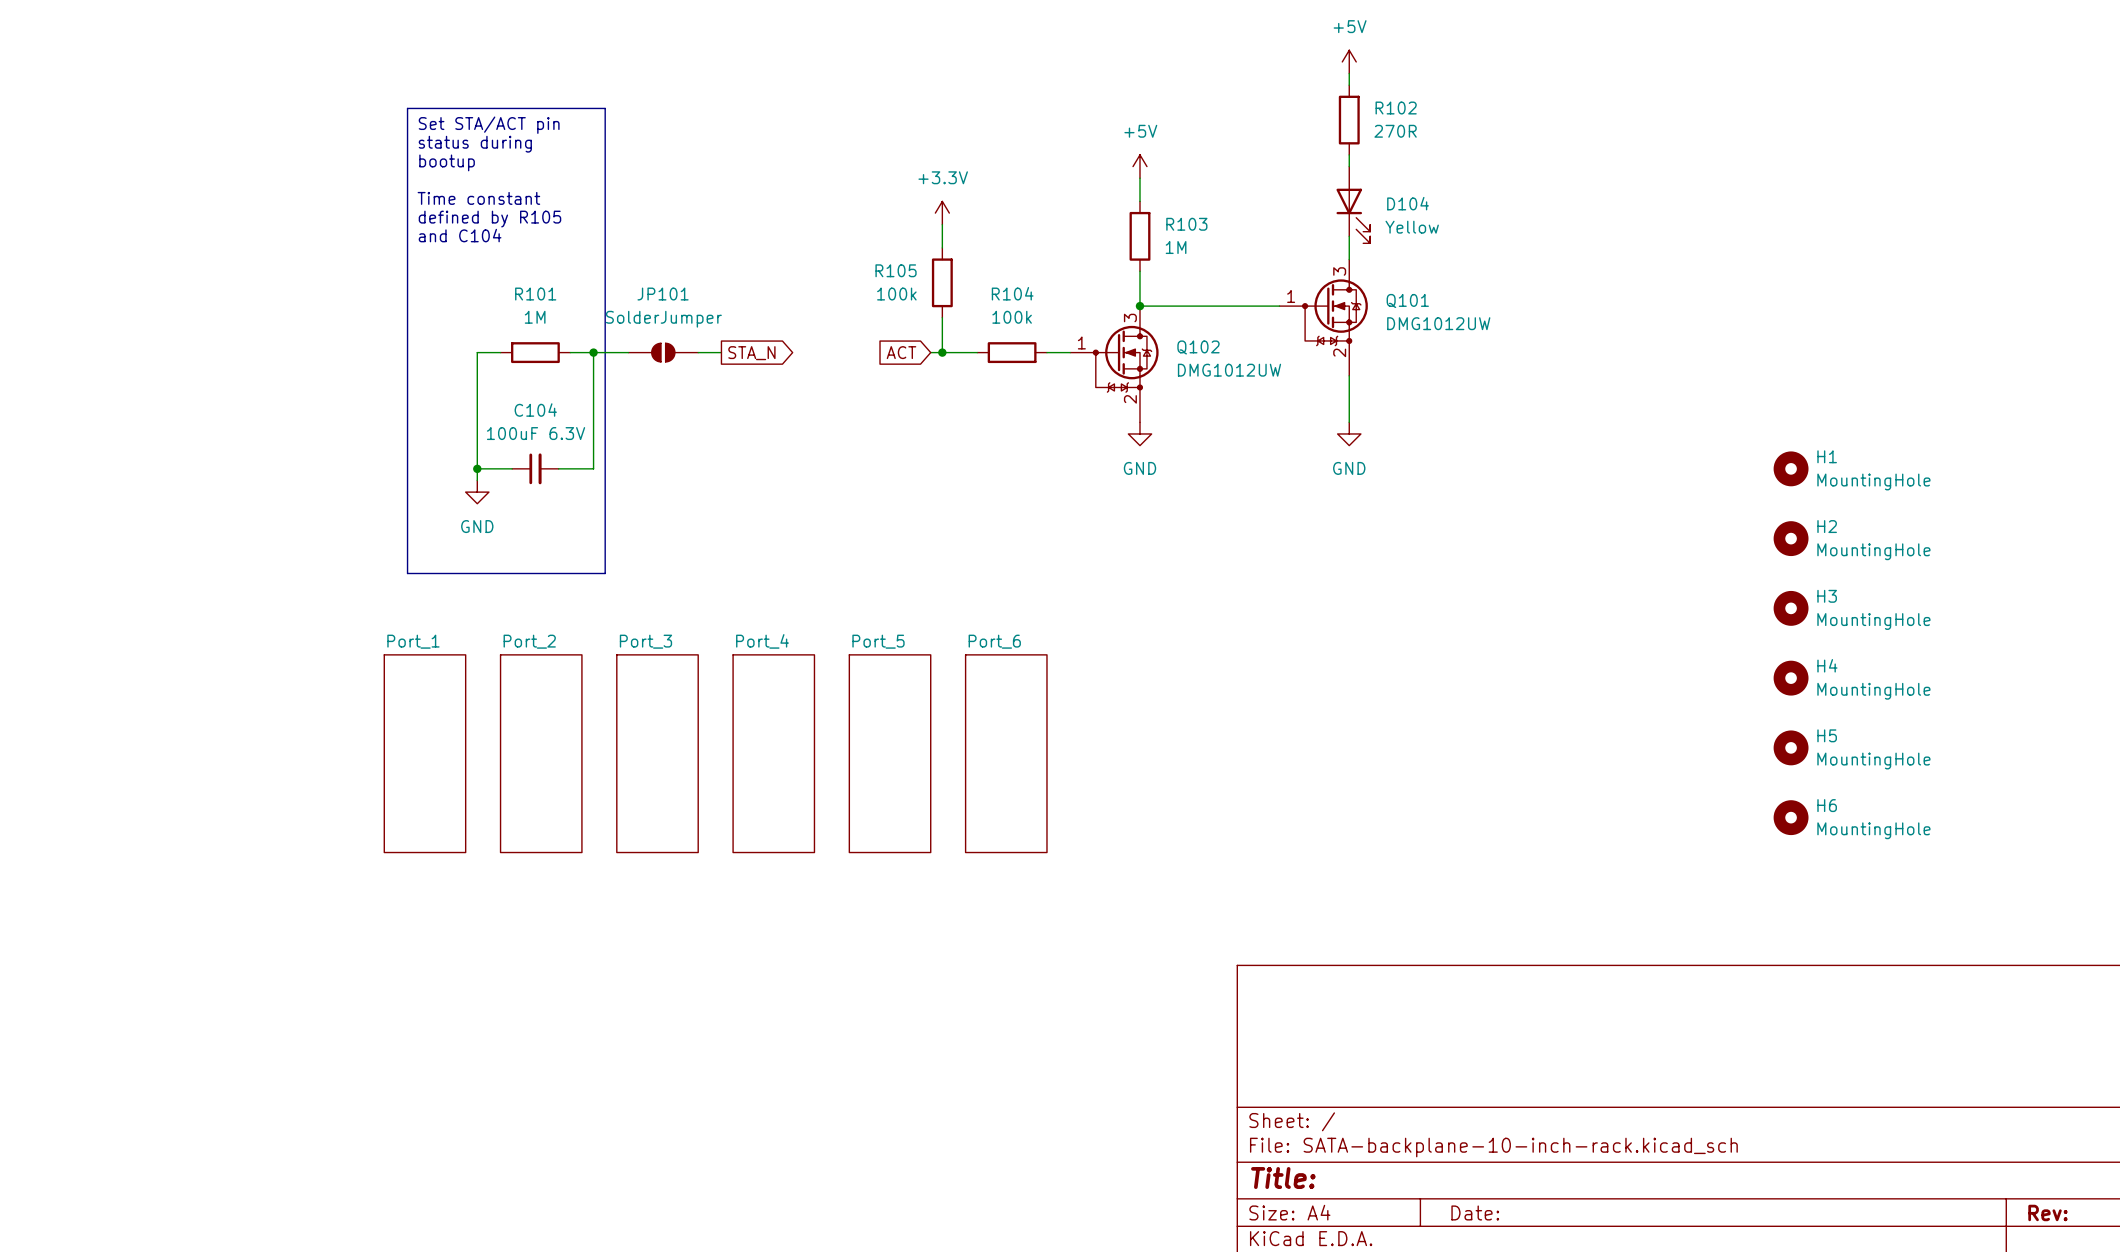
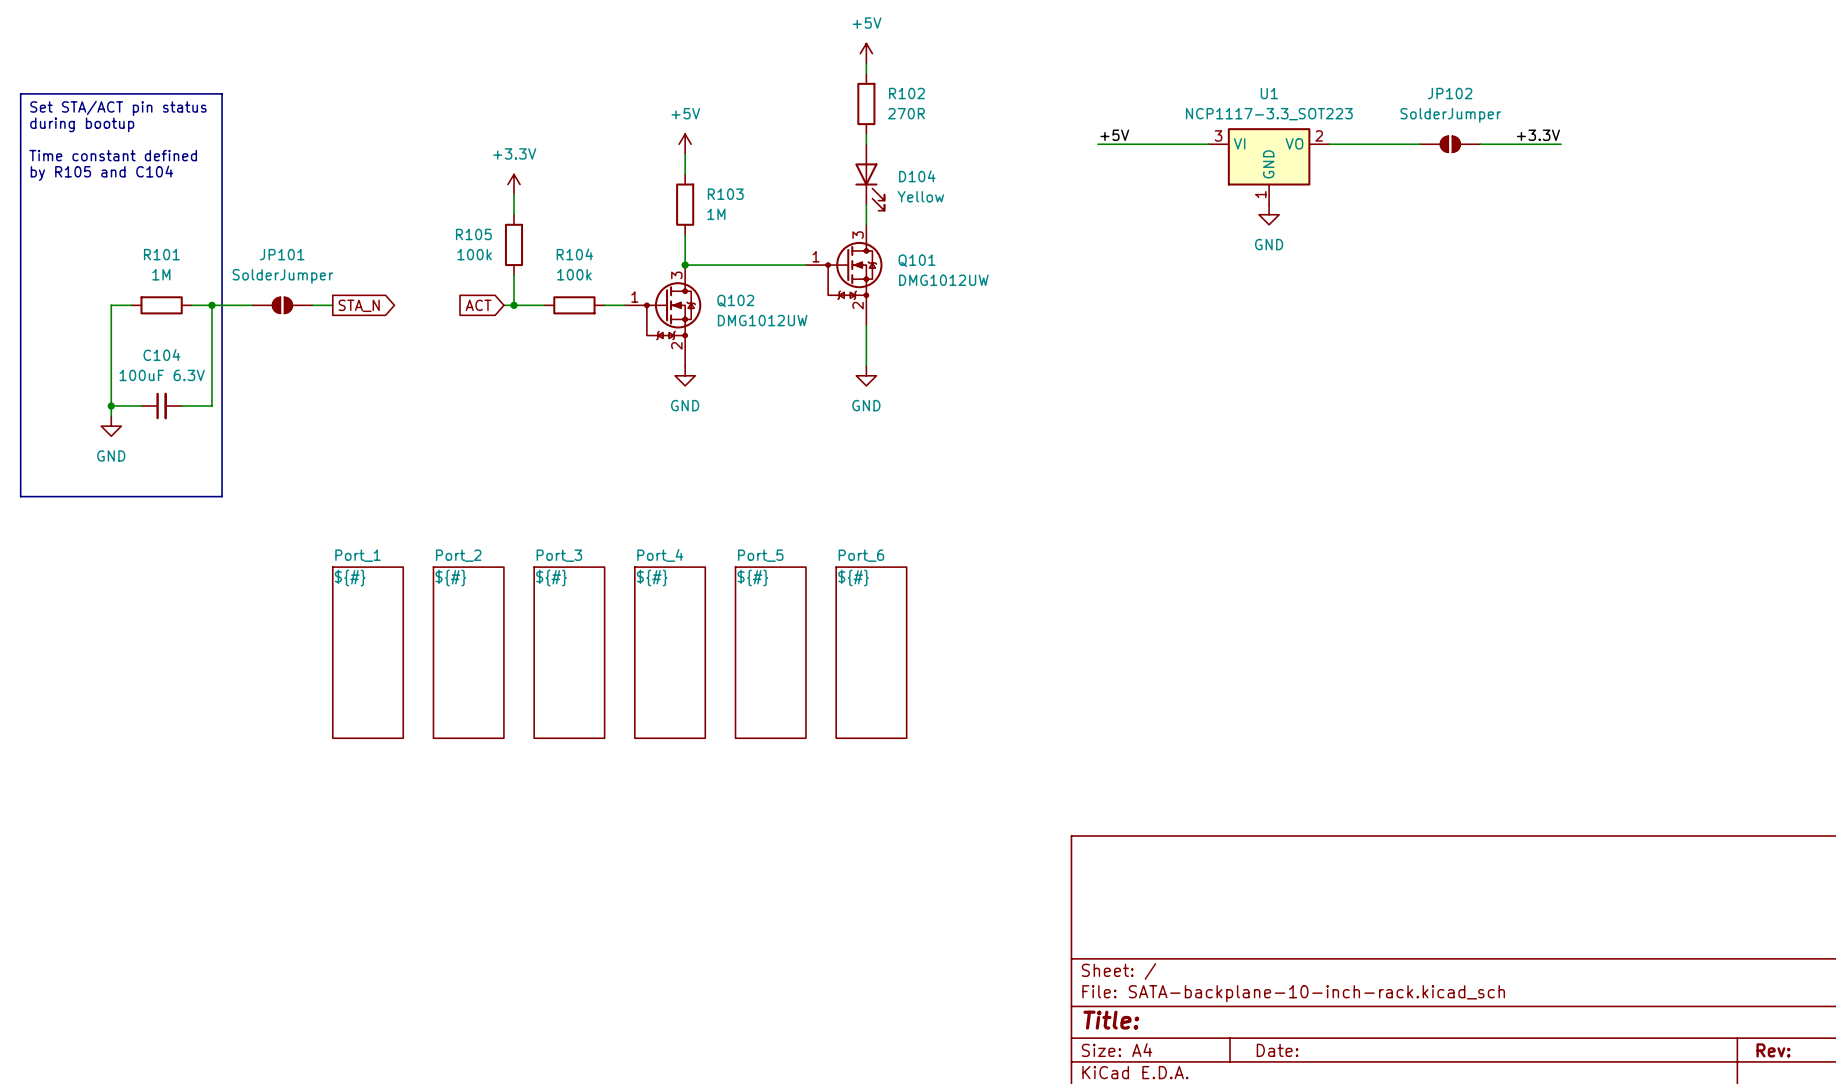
power symbol: none -> +5V (866, 53)
power symbol: +5V (1349, 61) -> none
wire: none -> (866, 63) (866, 73)
wire: (1349, 73) (1349, 85) -> none
line: none -> (20, 93) (222, 93) (222, 496) (20, 496) (20, 93)
line: (407, 108) (605, 108) (605, 573) (407, 573) (407, 108) -> none
R102 position: (1349, 120) -> (866, 103)
text: none -> Set STA/ACT pin status (118, 108)
text: Set STA/ACT pin (489, 125) -> none
text: none -> during bootup (82, 124)
text: status during (475, 144) -> none
wire: none -> (866, 134) (866, 144)
wire: (1349, 154) (1349, 166) -> none
label: none -> +5V (1114, 135)
label: none -> +3.3V (1538, 135)
text: bootup (447, 162) -> none
power symbol: none -> +5V (685, 144)
power symbol: +5V (1139, 166) -> none
wire: none -> (1097, 144) (1208, 144)
wire: none -> (1329, 144) (1420, 144)
JP102: none -> SolderJumper (1450, 144)
wire: none -> (1480, 144) (1561, 144)
wire: none -> (685, 154) (685, 174)
wire: (1139, 178) (1139, 201) -> none
text: none -> Time constant defined (113, 155)
U1: none -> NCP1117-3.3_SOT223 (1269, 166)
text: Time constant (478, 198) -> none
text: none -> by R105 and C104 (101, 173)
D104 position: (1353, 204) -> (869, 177)
power symbol: none -> +3.3V (514, 184)
power symbol: +3.3V (942, 213) -> none
text: defined by R105 (489, 219) -> none
wire: none -> (514, 194) (514, 214)
wire: (942, 224) (942, 247) -> (866, 204) (866, 224)
text: and C104 (460, 235) -> none
R103 position: (1139, 236) -> (685, 204)
wire: (1349, 236) (1349, 259) -> none
power symbol: none -> GND (1269, 214)
wire: none -> (685, 234) (685, 265) (805, 265)
wire: (1139, 271) (1139, 306) (1279, 306) -> none
R105 position: (942, 282) -> (514, 244)
junction: none -> (685, 265)
junction: (1139, 306) -> none
wire: (942, 317) (942, 352) -> none
Q101 position: (1323, 317) -> (844, 275)
wire: none -> (131, 305) (111, 305) (111, 416)
wire: none -> (191, 305) (252, 305)
wire: none -> (211, 305) (211, 406) (181, 406)
junction: none -> (211, 305)
wire: none -> (312, 305) (332, 305)
wire: (500, 352) (477, 352) (477, 480) -> none
R101 position: (535, 352) -> (161, 305)
global label: none -> ACT (478, 305)
wire: (570, 352) (581, 352) -> none
wire: (593, 352) (593, 468) (558, 468) -> (514, 305) (514, 275)
JP101 position: (663, 352) -> (282, 305)
global label: ACT (901, 352) -> none
wire: (930, 352) (977, 352) -> none
junction: (942, 352) -> none
R104 position: (1012, 352) -> (574, 305)
wire: (1046, 352) (1070, 352) -> none
global label: none -> STA_N (359, 305)
global label: STA_N (751, 353) -> none
Q102 position: (1114, 364) -> (663, 315)
wire: none -> (866, 325) (866, 365)
wire: (1349, 375) (1349, 422) -> none
power symbol: none -> GND (685, 375)
power symbol position: GND (1139, 433) -> GND (866, 375)
power symbol: GND (1349, 433) -> none
wire: none -> (111, 406) (141, 406)
junction: none -> (111, 406)
wire: (477, 468) (512, 468) -> none
junction: (477, 468) -> none
C104 position: (535, 468) -> (161, 406)
H1: MountingHole (1791, 468) -> none
power symbol: none -> GND (111, 426)
power symbol: GND (477, 492) -> none
H2: MountingHole (1791, 538) -> none
H3: MountingHole (1791, 608) -> none
sheet Port_1 text: none -> ${#} (350, 577)
sheet Port_2 text: none -> ${#} (450, 577)
sheet Port_3 text: none -> ${#} (551, 577)
sheet Port_4 text: none -> ${#} (652, 577)
sheet Port_5 text: none -> ${#} (752, 577)
sheet Port_6 text: none -> ${#} (853, 577)
H4: MountingHole (1791, 678) -> none
H5: MountingHole (1791, 747) -> none
H6: MountingHole (1791, 817) -> none

